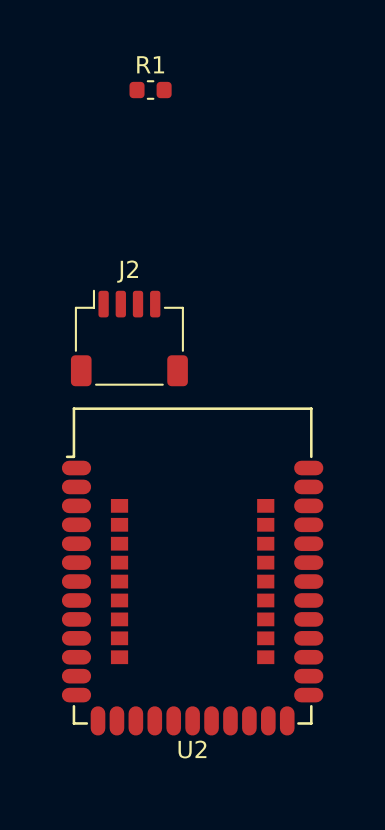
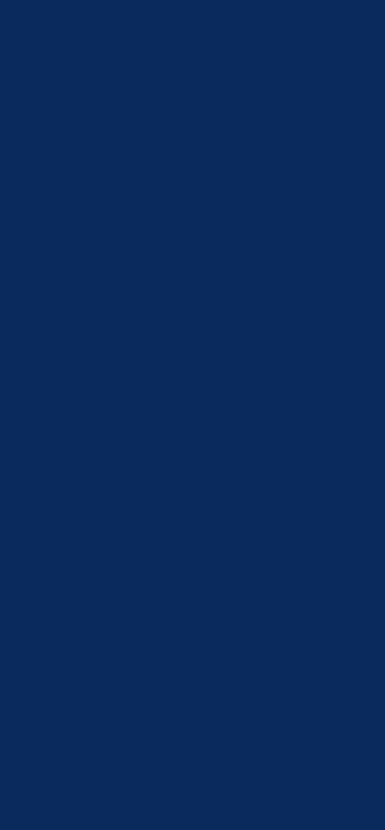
R1: (150, 90) -> none
J2: (129, 337) -> none
U2: (192, 571) -> none

